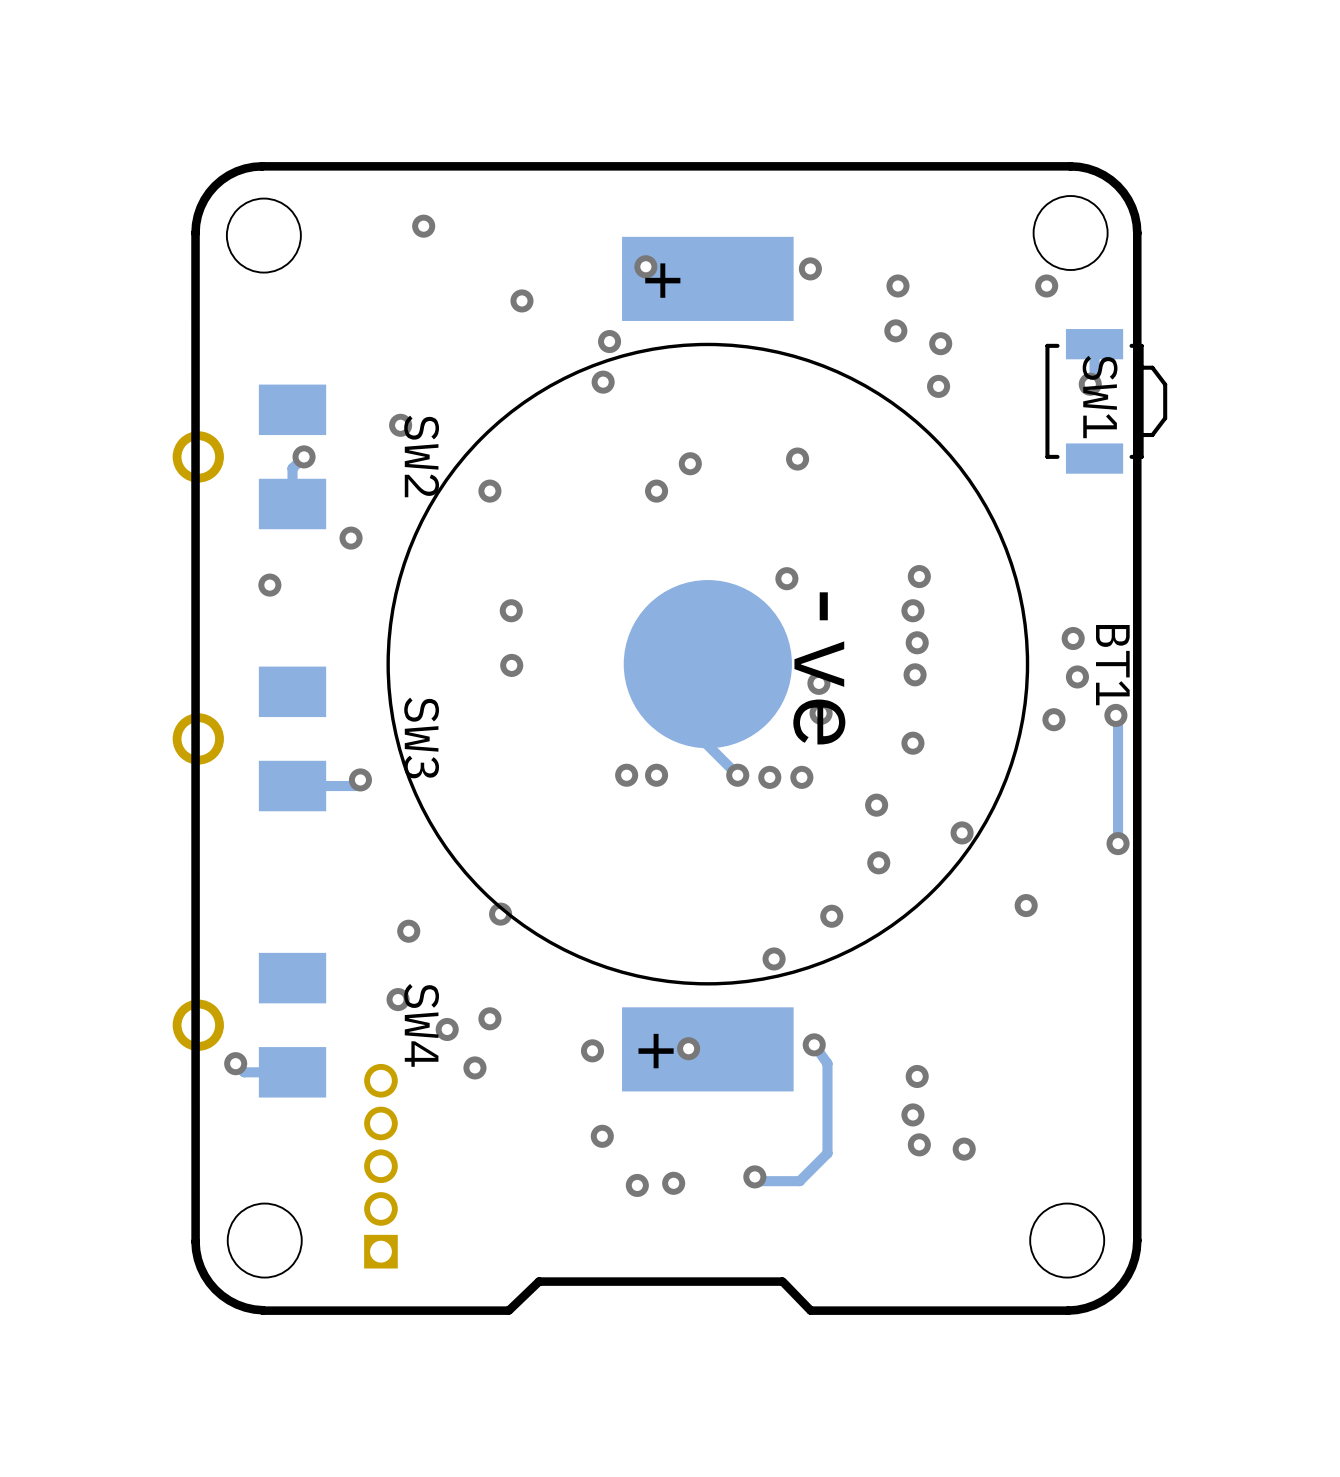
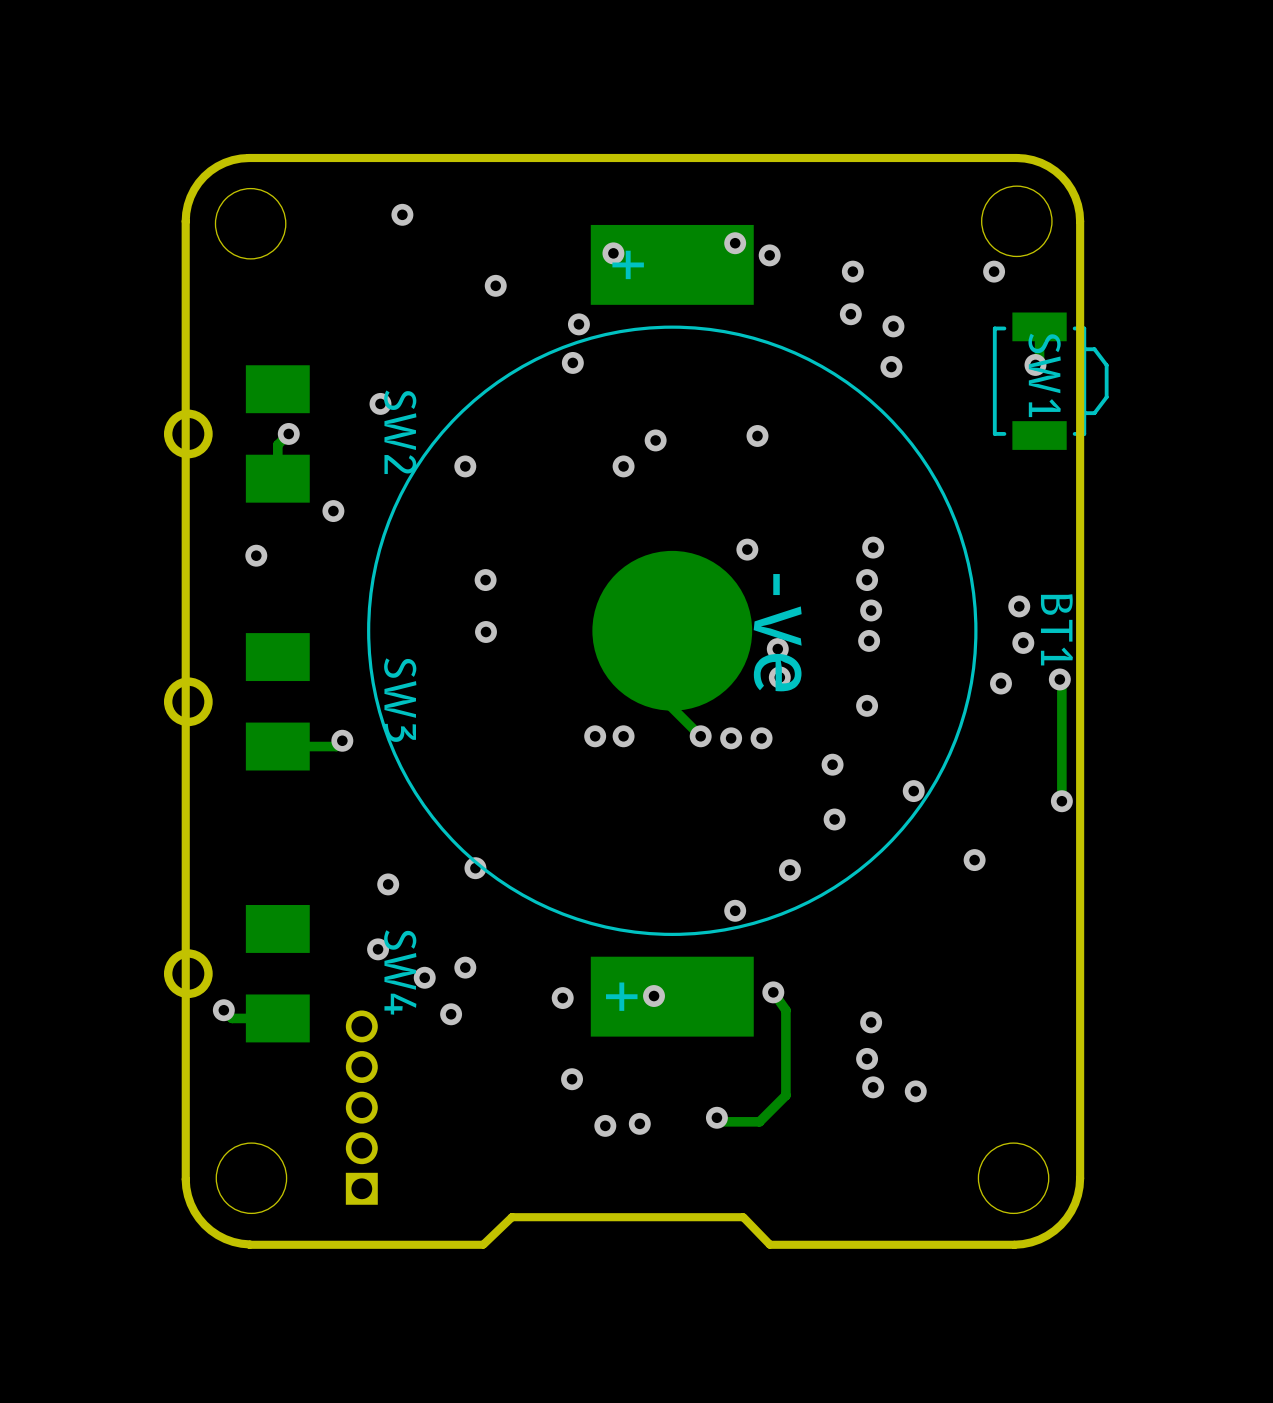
via: none -> (735, 243)

